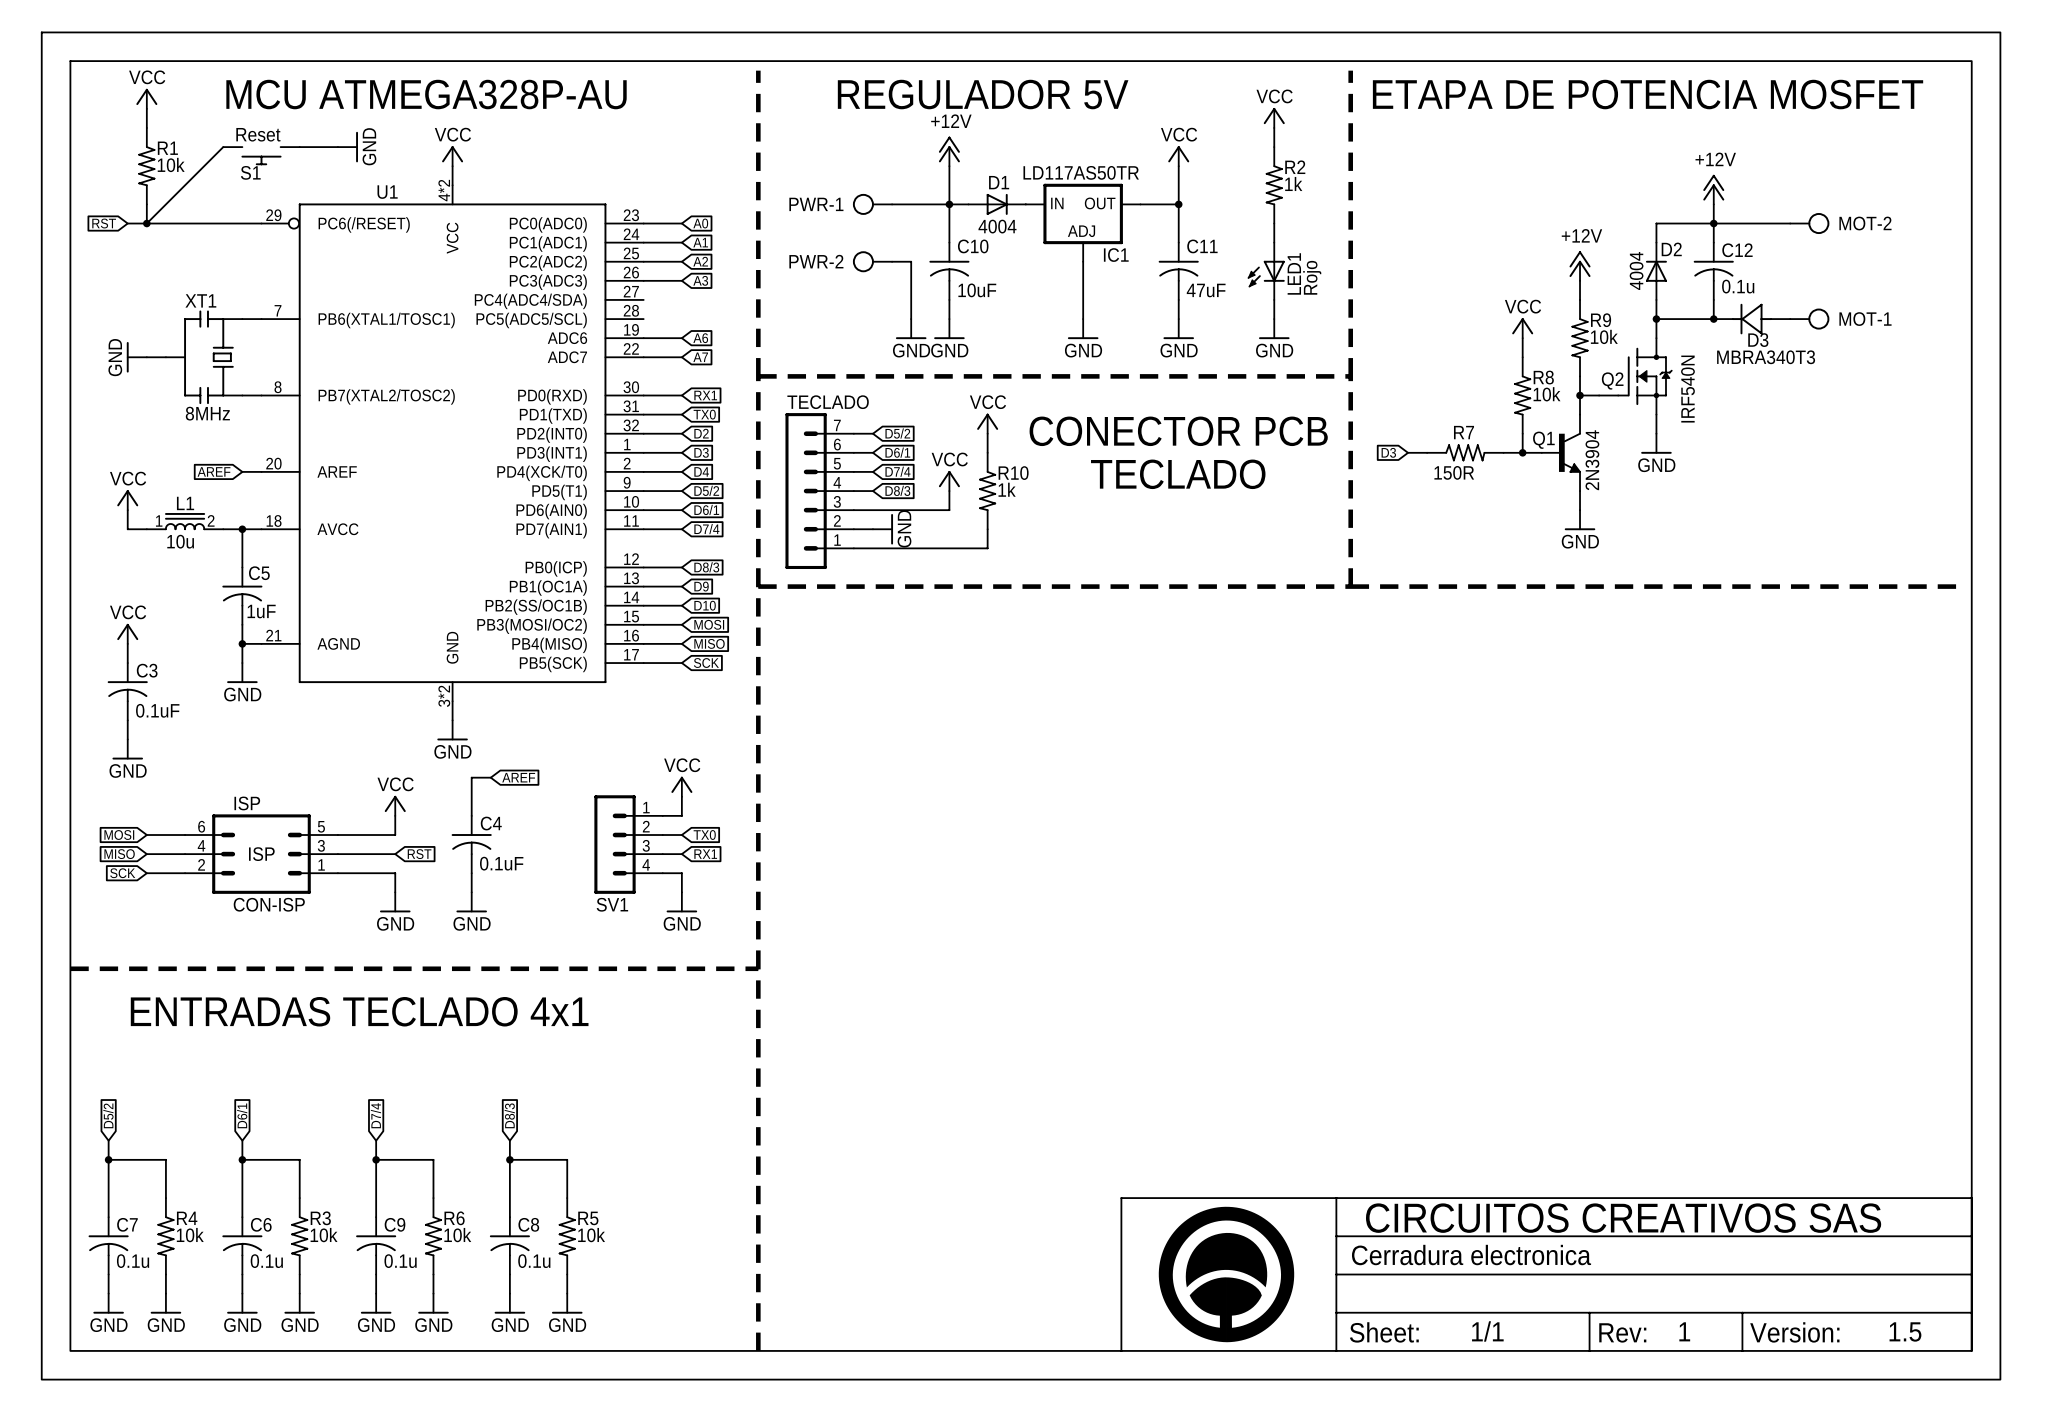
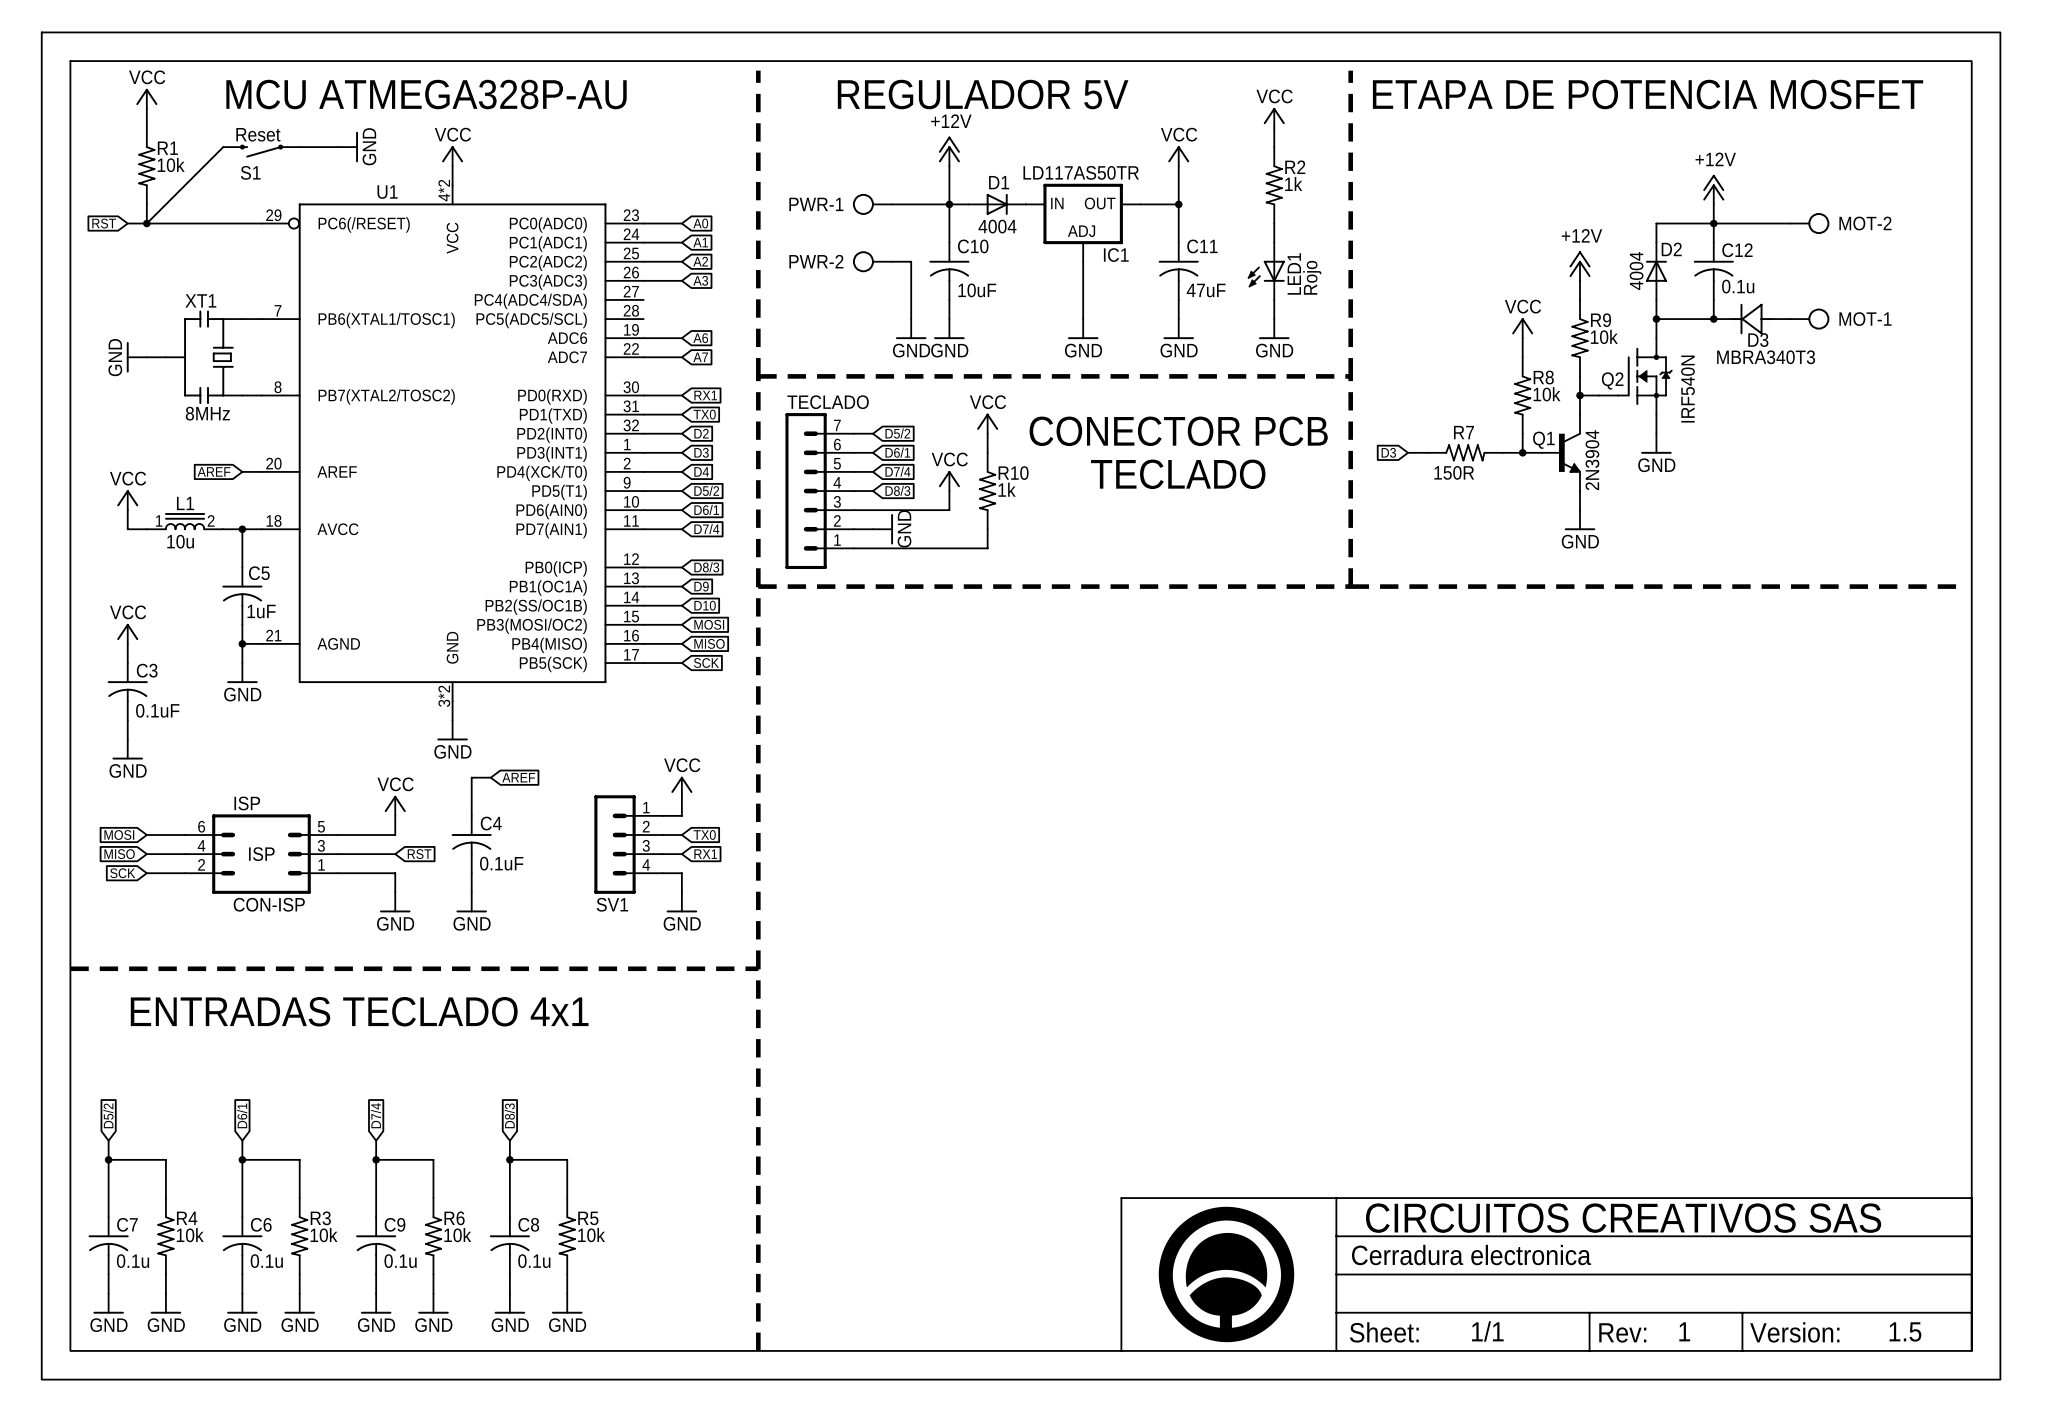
S1 symbol: [223, 147, 300, 166] -> [223, 144, 300, 158]

